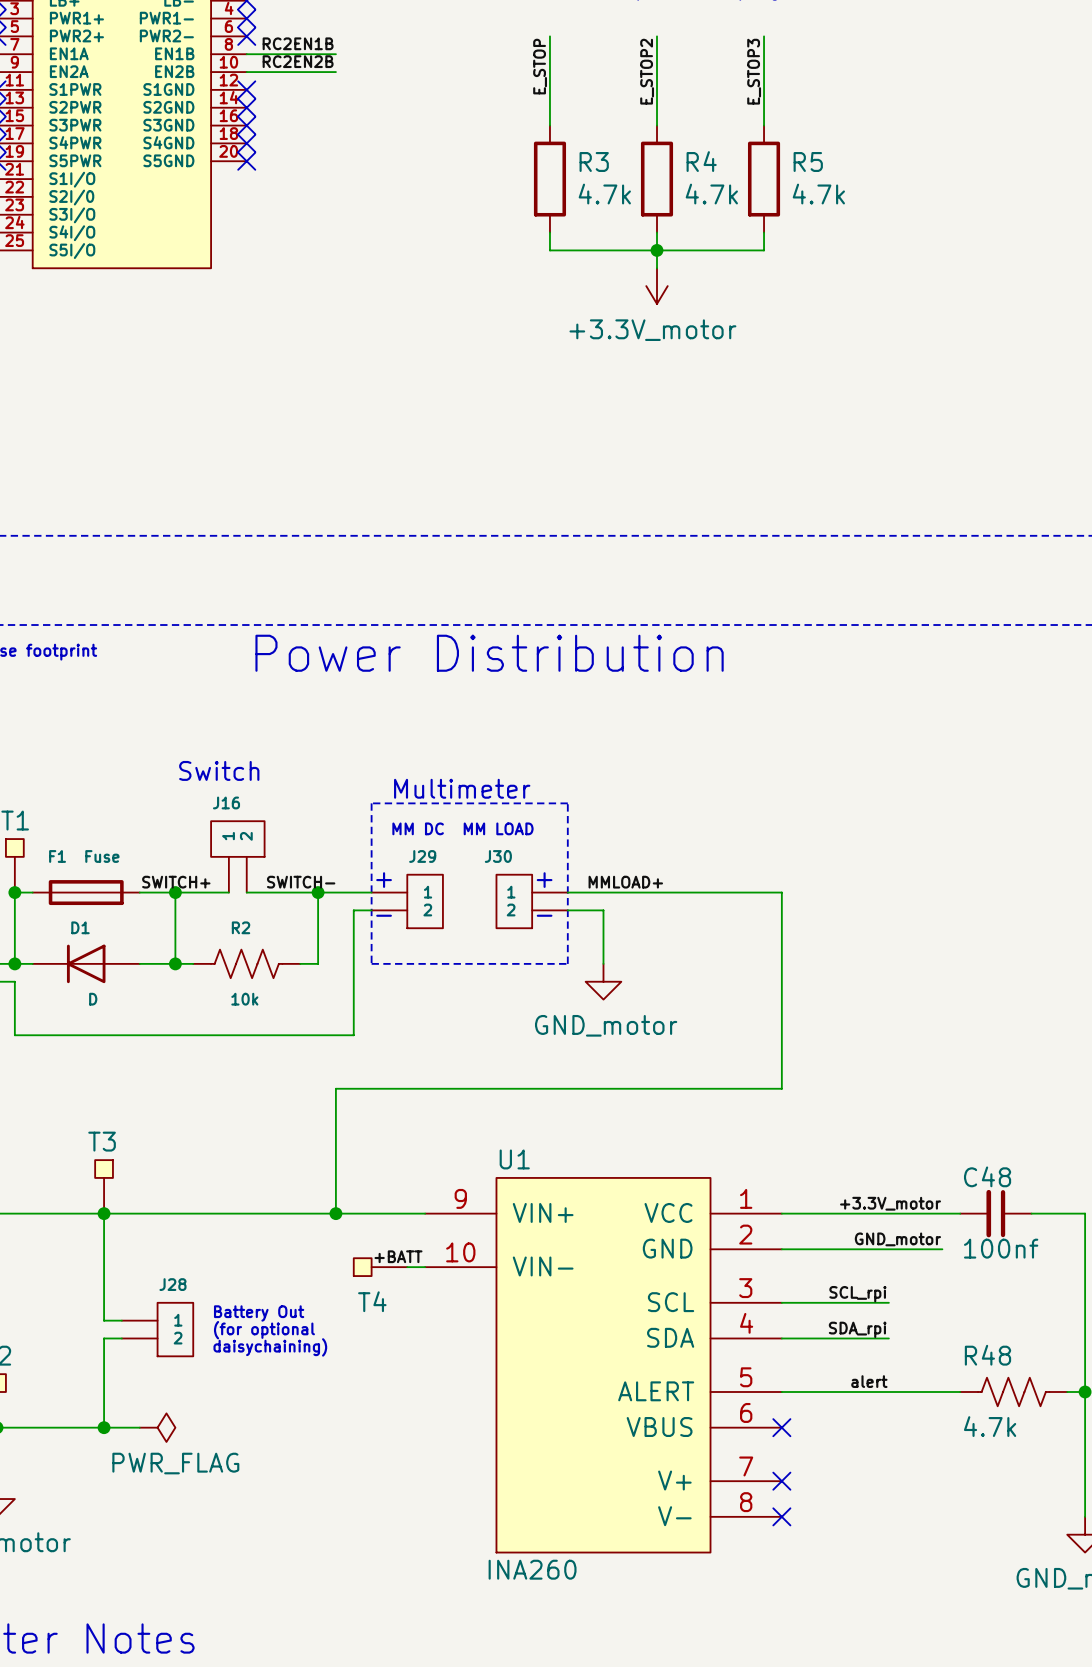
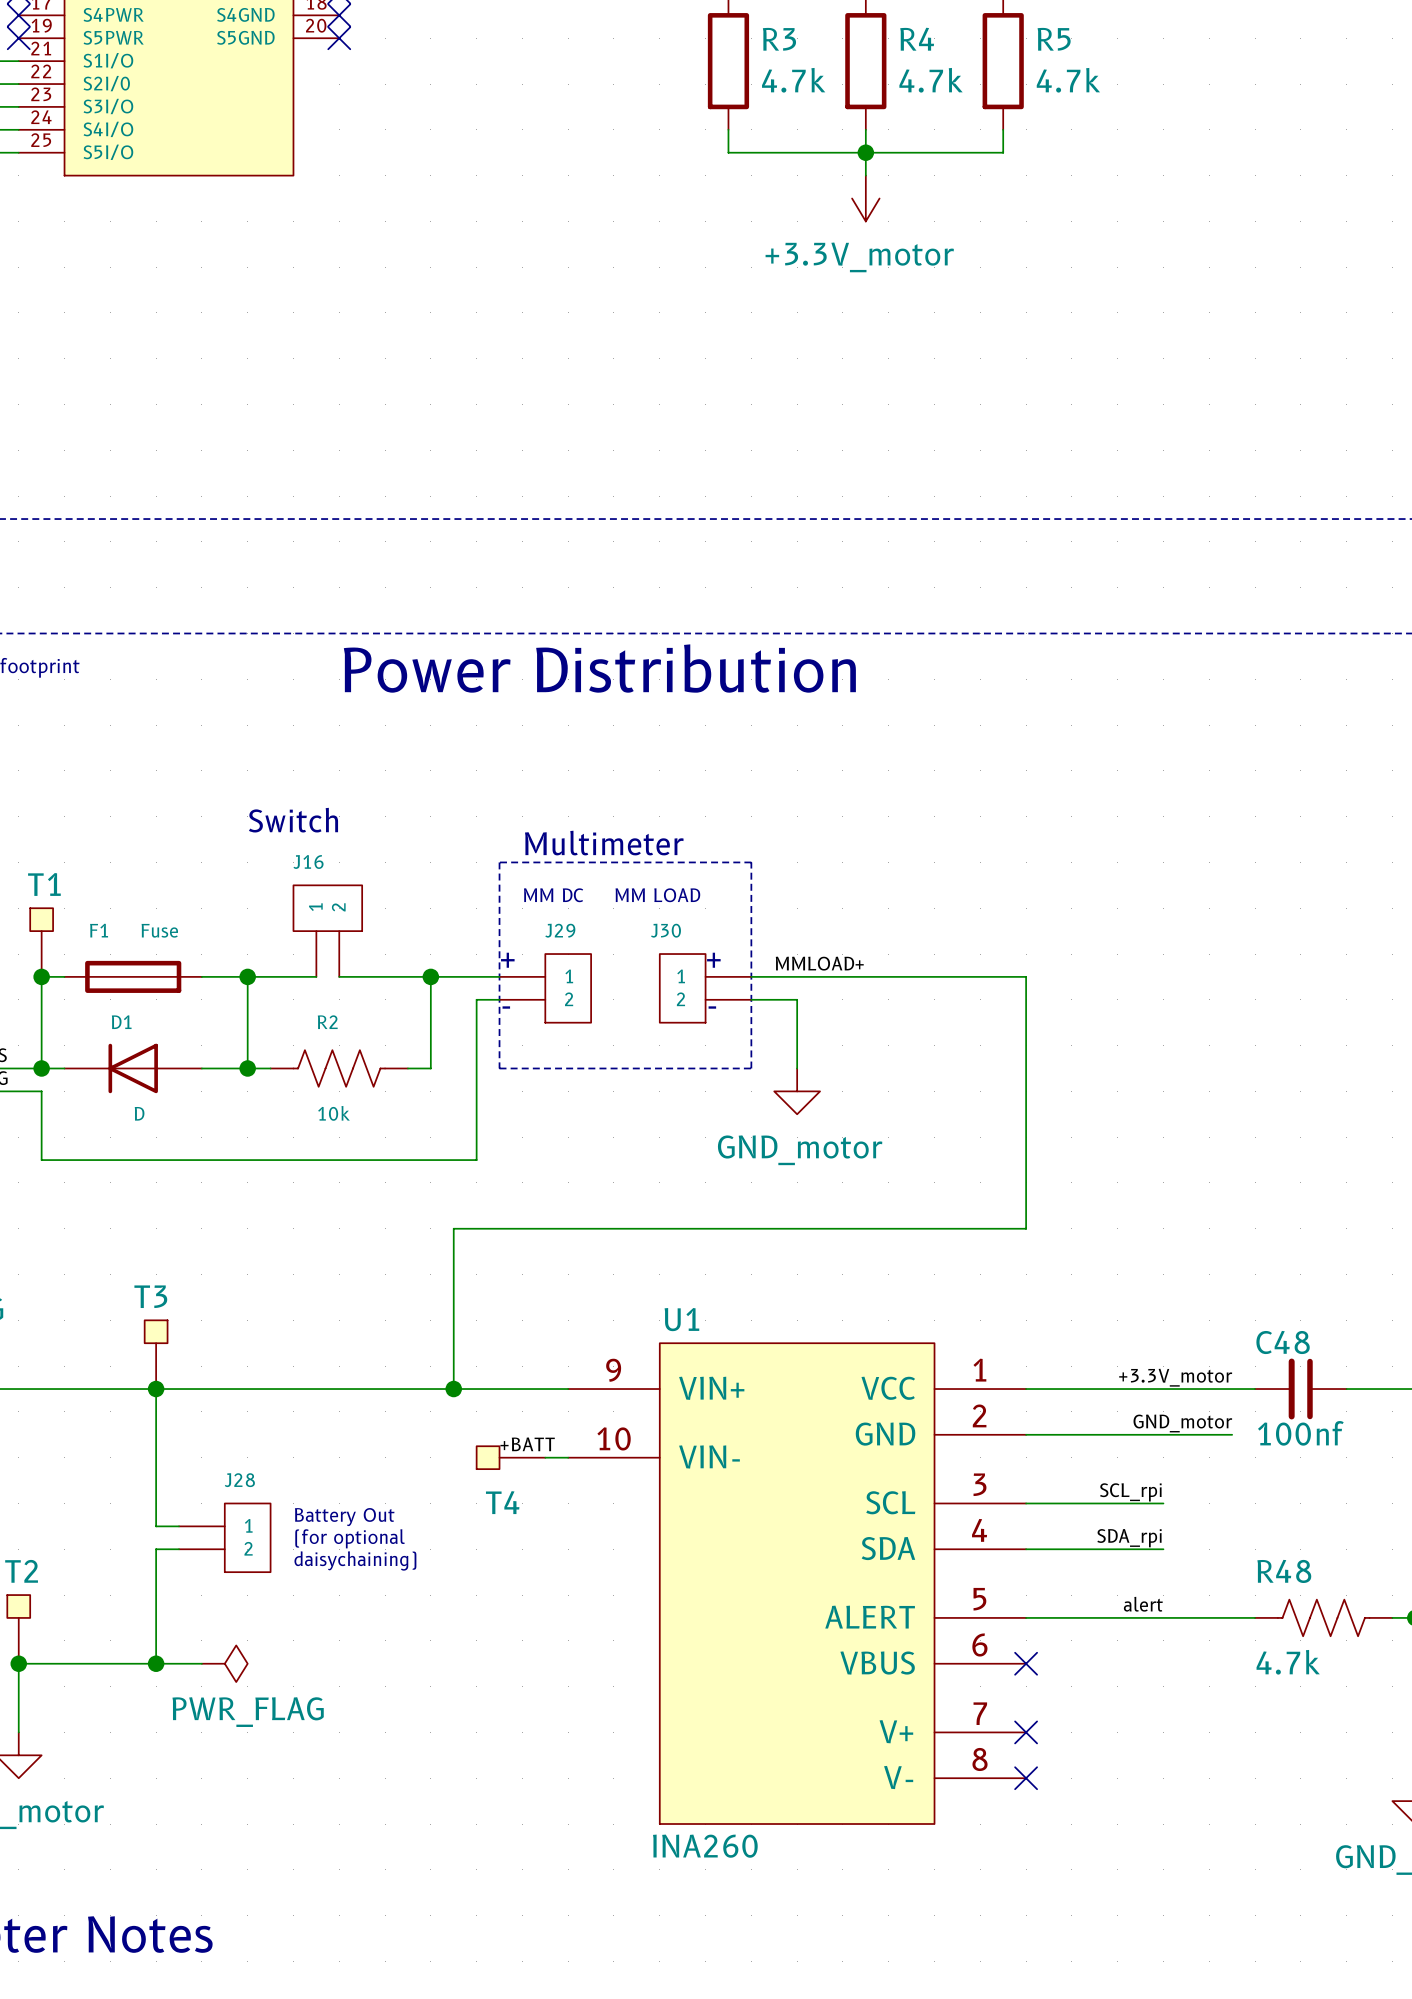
label: SWITCH+ (176, 882) -> none
label: SWITCH- (301, 882) -> none

